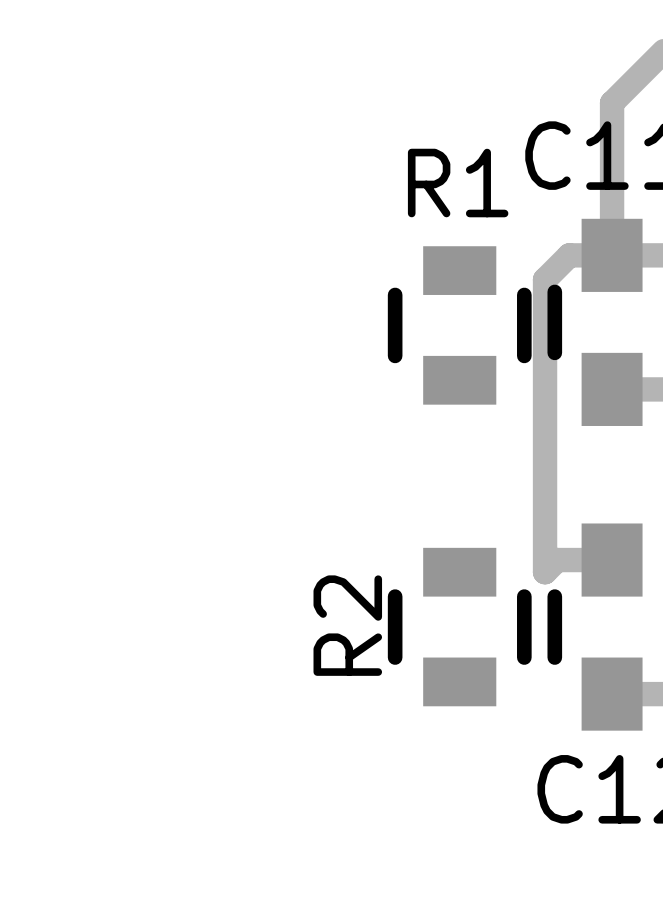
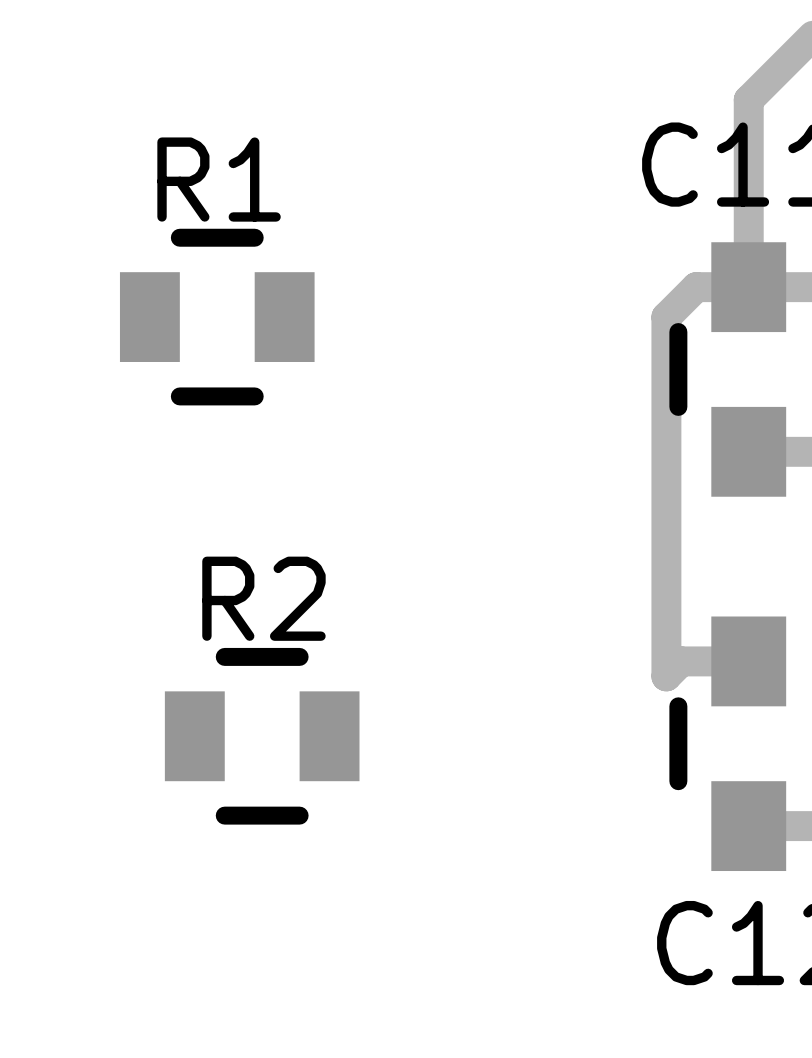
R1 rotation: 0° (459, 325) -> 90° clockwise (217, 317)
R1 position: (459, 325) -> (217, 317)
R2 rotation: 0° (459, 627) -> 90° clockwise (262, 736)
R2 position: (459, 627) -> (262, 736)

